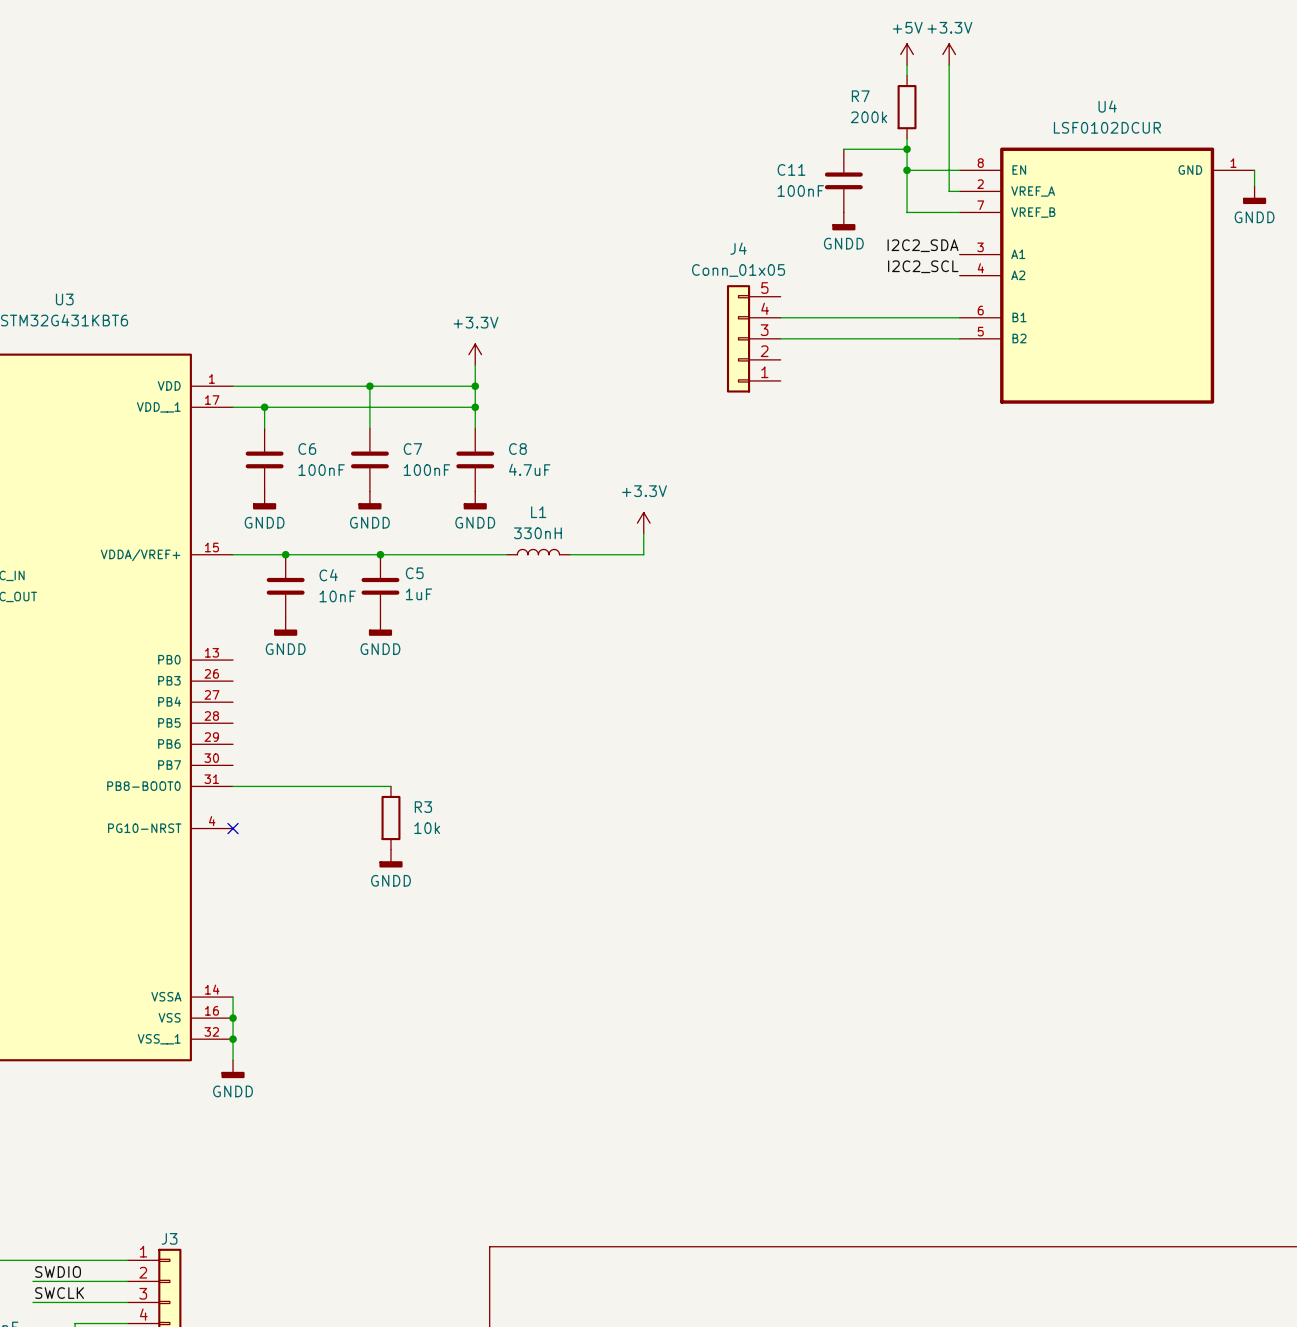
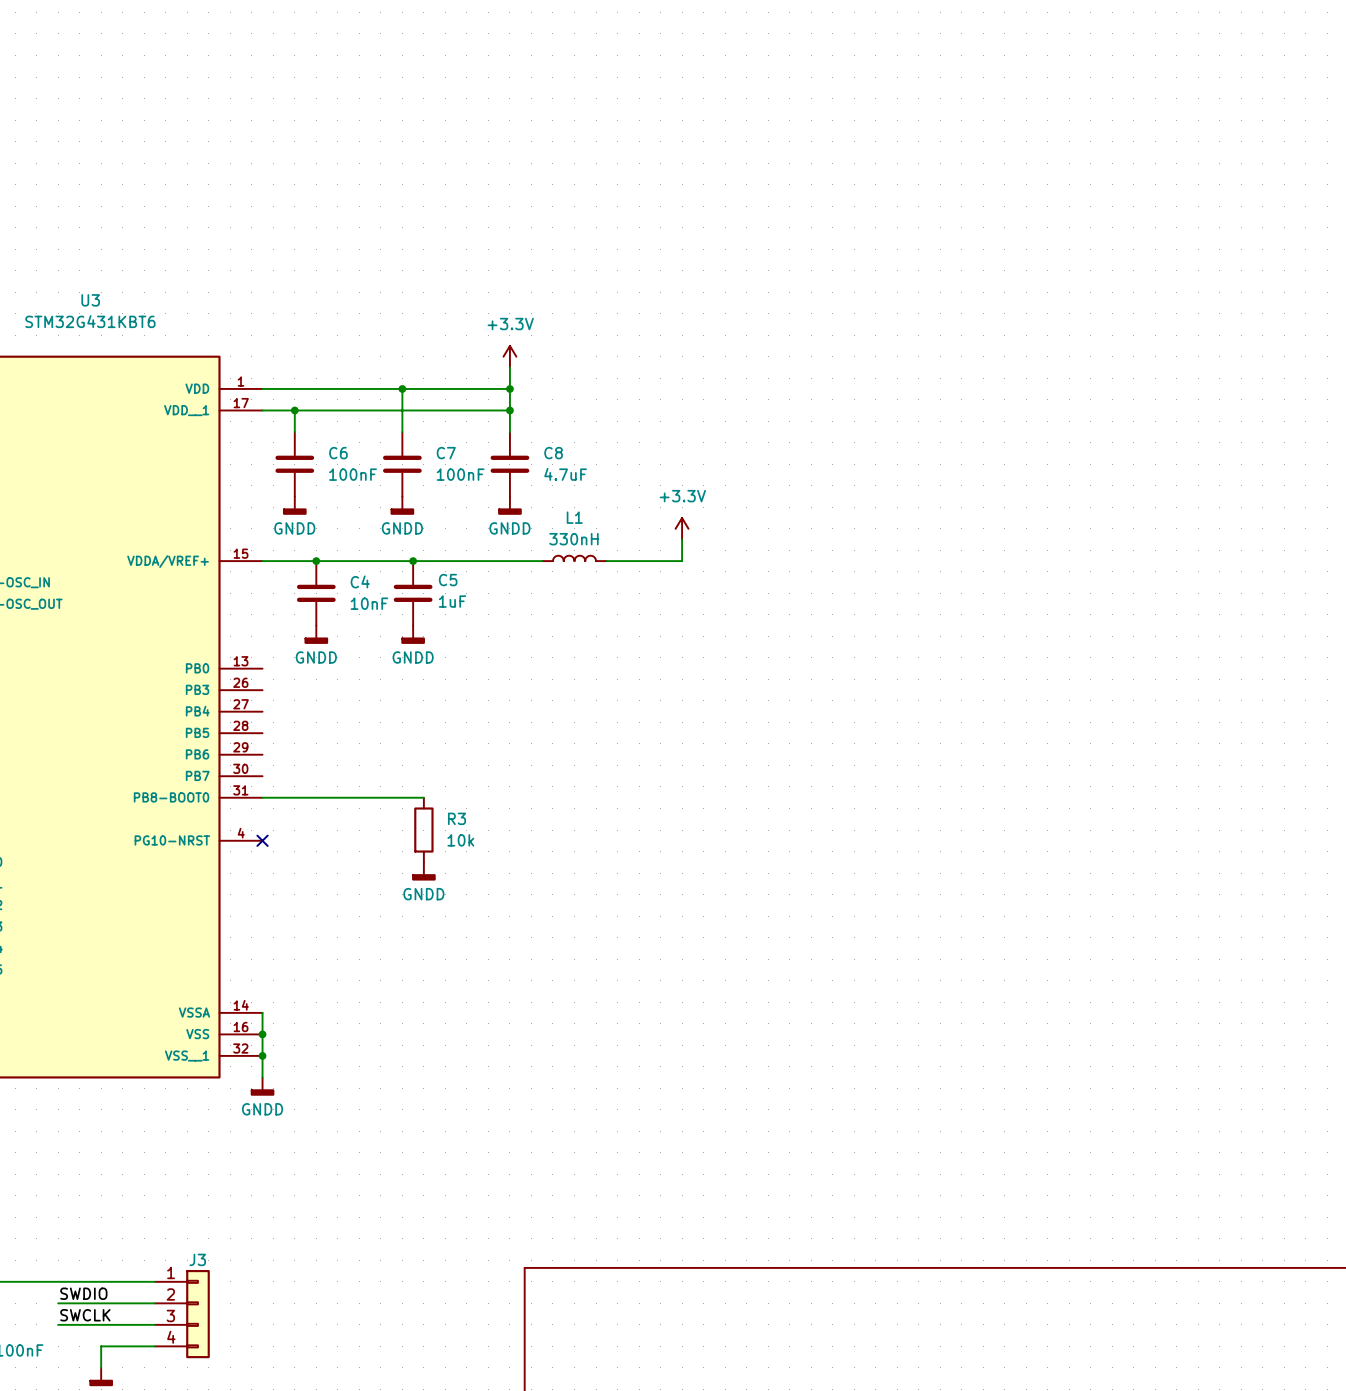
power symbol: +5V (907, 54) -> none
power symbol: +3.3V (949, 54) -> none
wire: (907, 65) (907, 75) -> none
wire: (949, 65) (949, 191) (959, 191) -> none
R7: 200k (907, 107) -> none
wire: (907, 138) (907, 212) (959, 212) -> none
wire: (843, 149) (907, 149) -> none
junction: (907, 149) -> none
wire: (907, 170) (959, 170) -> none
junction: (907, 170) -> none
wire: (1254, 170) (1254, 186) -> none
C11: 100nF (843, 180) -> none
power symbol: GNDD (1254, 195) -> none
power symbol: GNDD (843, 221) -> none
label: I2C2_SDA (923, 245) -> none
label: I2C2_SCL (923, 266) -> none
U4: LSF0102DCUR (1107, 275) -> none
wire: (780, 317) (959, 317) -> none
J4: Conn_01x05 (753, 338) -> none
wire: (780, 338) (959, 338) -> none

